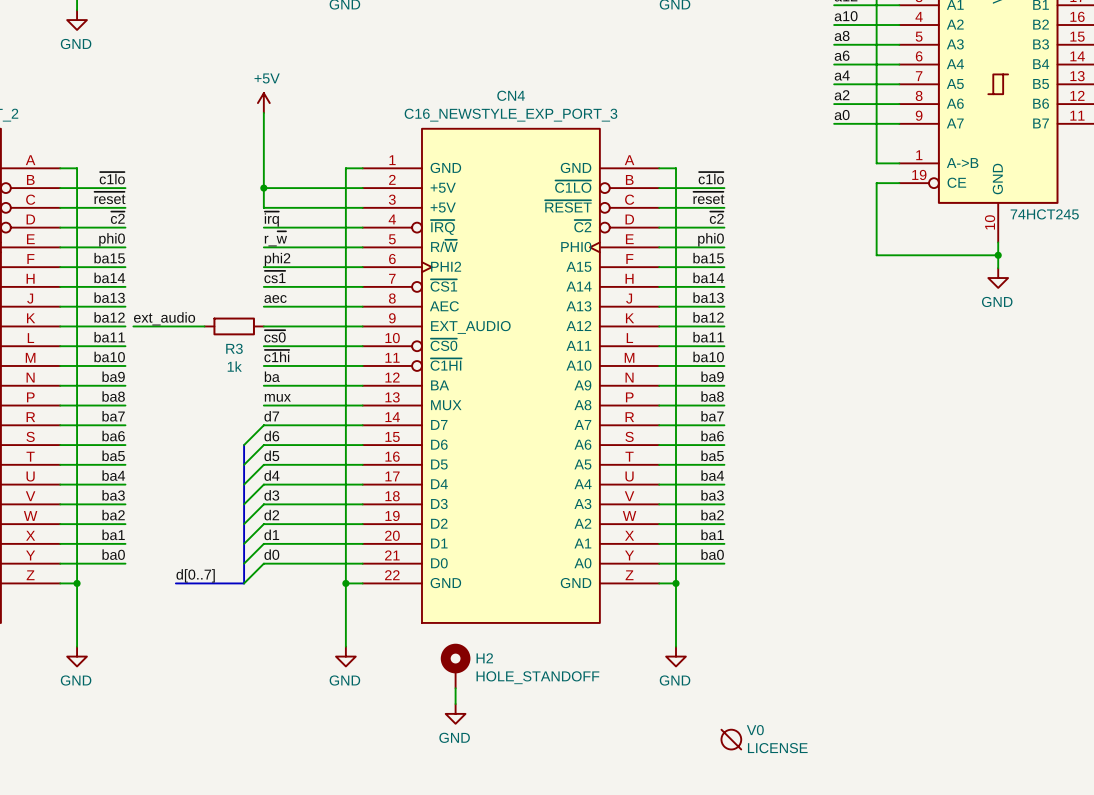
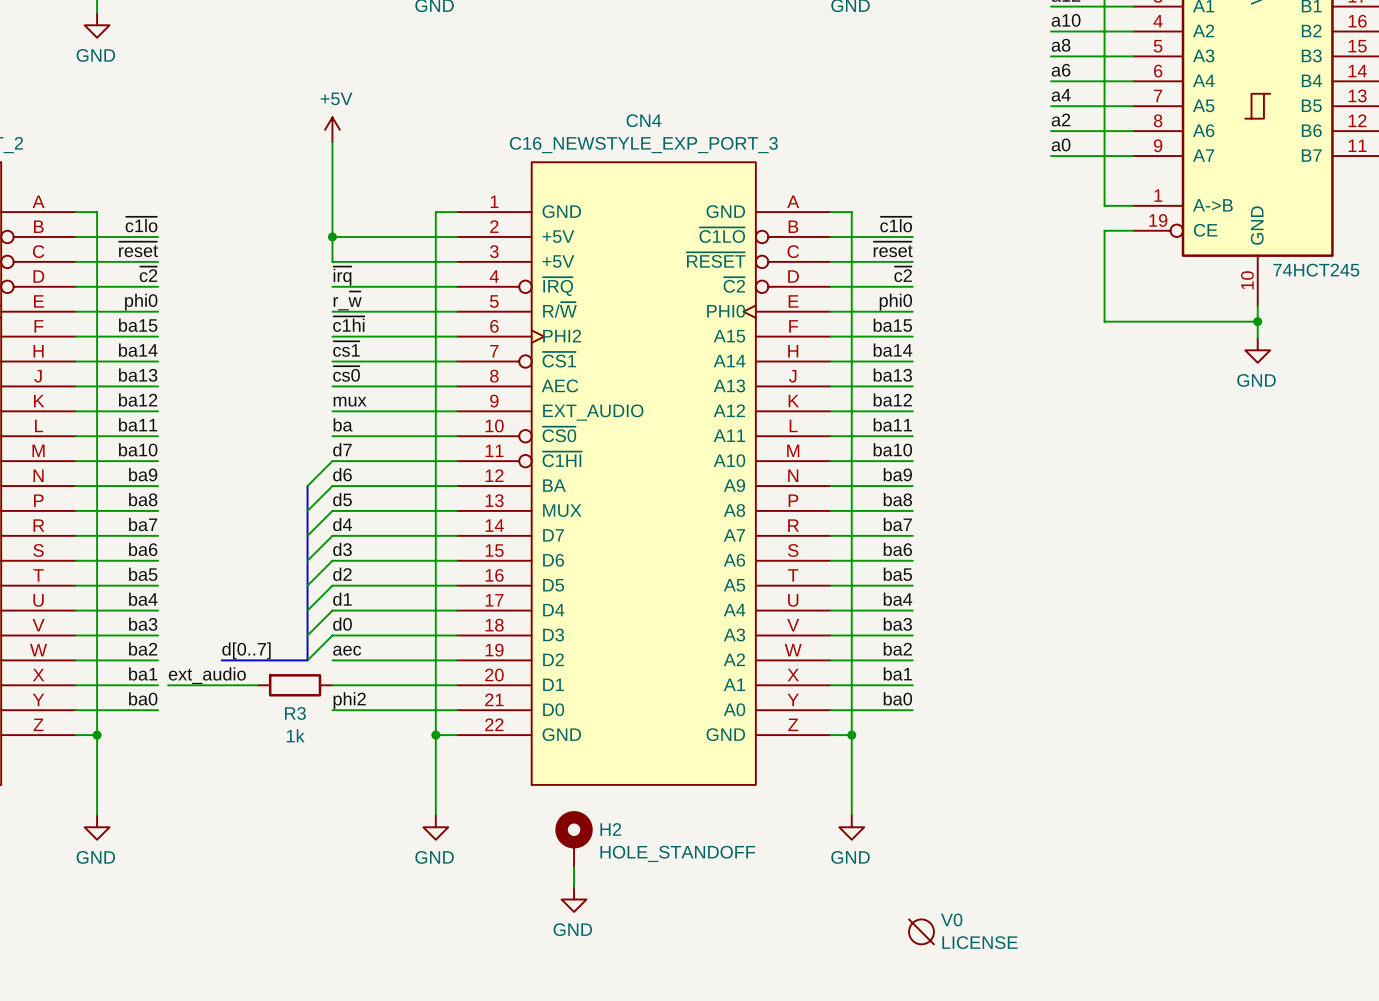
label: phi2 (277, 259) -> ~{c1hi} (348, 324)
label: aec (275, 299) -> ~{cs0} (346, 373)
label: ext_audio (164, 318) -> none
label: none -> mux (350, 401)
wire: (133, 326) (204, 326) -> none
R3 position: (234, 326) -> (295, 685)
label: ~{cs0} (275, 336) -> ba (343, 424)
label: ~{c1hi} (276, 356) -> d7 (342, 449)
label: ba (272, 376) -> d6 (342, 474)
bus: none -> (307, 486) (307, 560)
label: mux (277, 397) -> d5 (342, 499)
label: d7 (271, 416) -> d4 (342, 524)
label: d6 (271, 436) -> d3 (342, 549)
label: d5 (271, 455) -> d2 (342, 574)
label: d4 (271, 475) -> d1 (342, 599)
label: d3 (271, 495) -> d0 (342, 624)
label: d2 (271, 515) -> aec (347, 650)
bus: (244, 524) (244, 583) (175, 583) -> (307, 660) (221, 660)
wire: (263, 524) (244, 543) -> (332, 461) (307, 486)
label: d1 (271, 534) -> none
label: none -> ext_audio (207, 675)
wire: none -> (168, 685) (257, 685)
wire: (263, 543) (244, 563) -> (332, 486) (307, 510)
label: d0 (271, 554) -> phi2 (349, 700)
wire: (263, 563) (244, 583) -> (332, 510) (307, 535)
label position: d[0..7] (195, 575) -> d[0..7] (246, 650)

